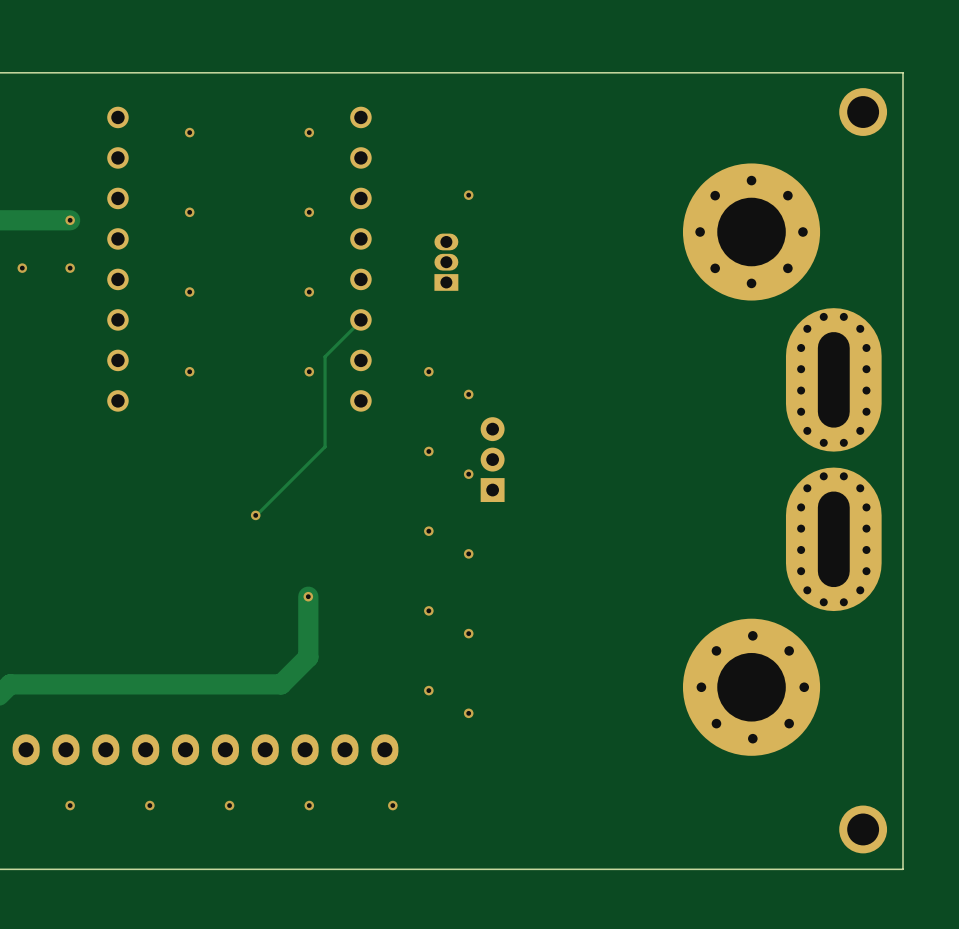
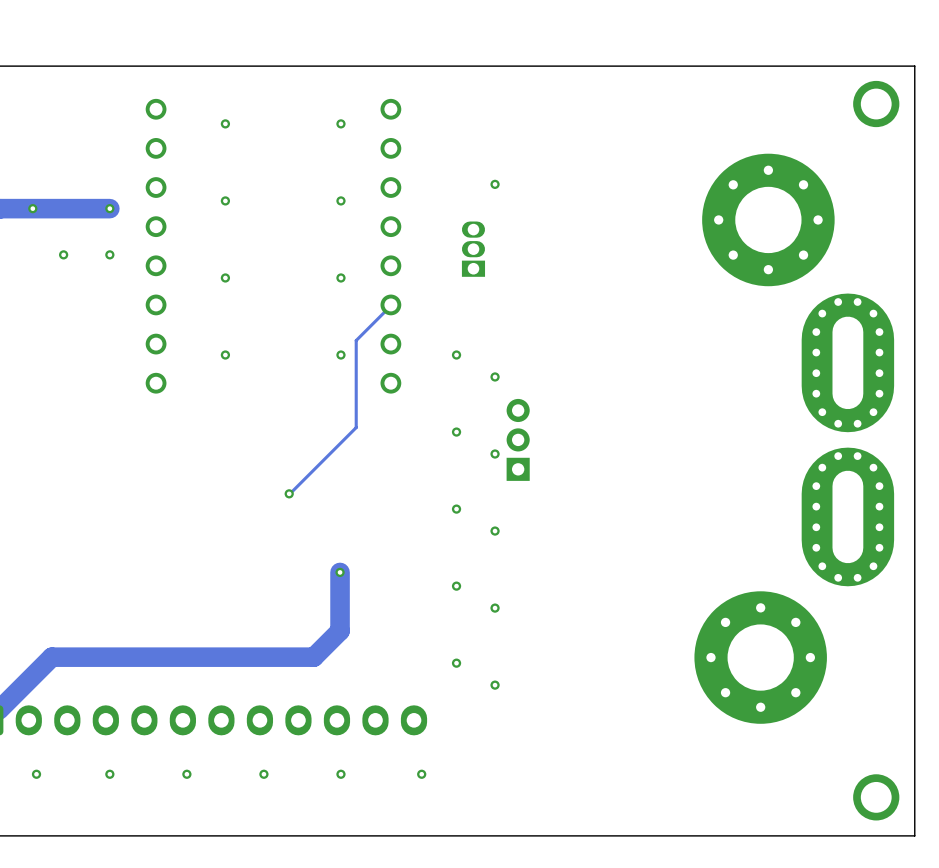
part footprint: [682, 618, 821, 756] -> [694, 591, 827, 724]

